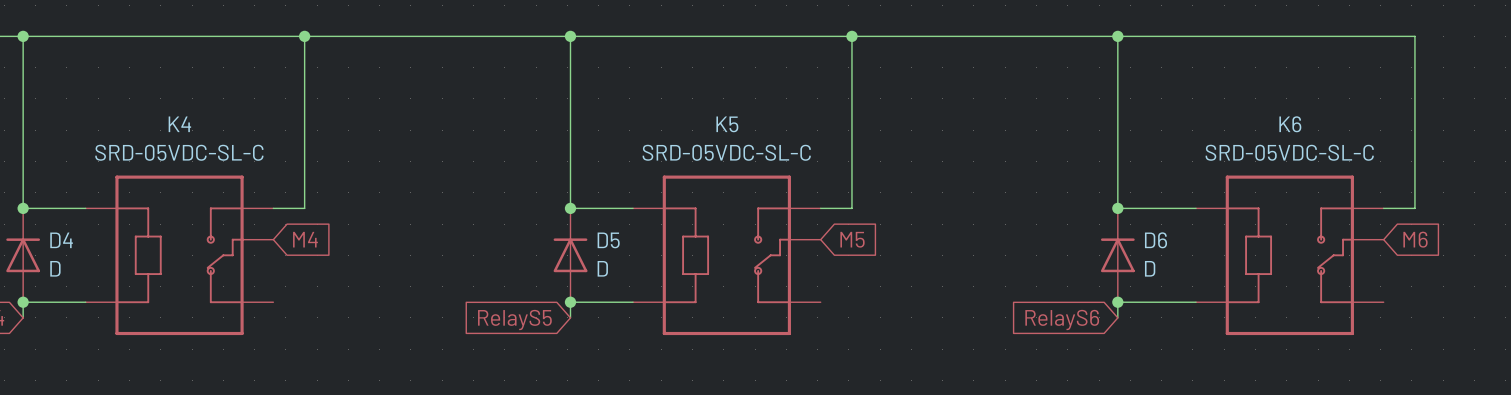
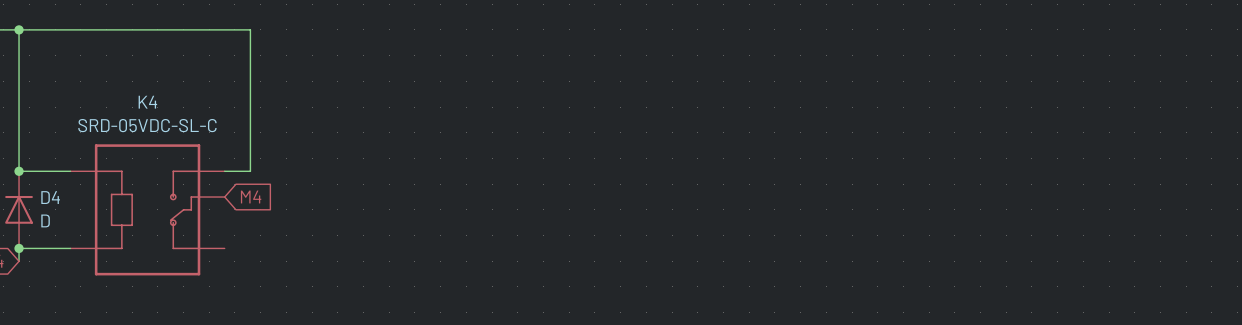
wire: (304, 36) (1414, 36) (1414, 208) (1383, 208) -> none
junction: (304, 36) -> none
wire: (570, 36) (570, 208) (633, 208) -> none
junction: (570, 36) -> none
wire: (851, 36) (851, 208) (820, 208) -> none
junction: (851, 36) -> none
wire: (1117, 36) (1117, 208) (1196, 208) -> none
junction: (1117, 36) -> none
junction: (570, 208) -> none
junction: (1117, 208) -> none
global label: M5 (852, 239) -> none
global label: M6 (1415, 239) -> none
D5: D (570, 255) -> none
K5: SRD-05VDC-SL-C (726, 255) -> none
D6: D (1117, 255) -> none
K6: SRD-05VDC-SL-C (1289, 255) -> none
junction: (570, 302) -> none
wire: (633, 302) (570, 302) (570, 317) -> none
junction: (1117, 302) -> none
wire: (1196, 302) (1117, 302) (1117, 317) -> none
global label: RelayS5 (514, 320) -> none
global label: RelayS6 (1062, 320) -> none

